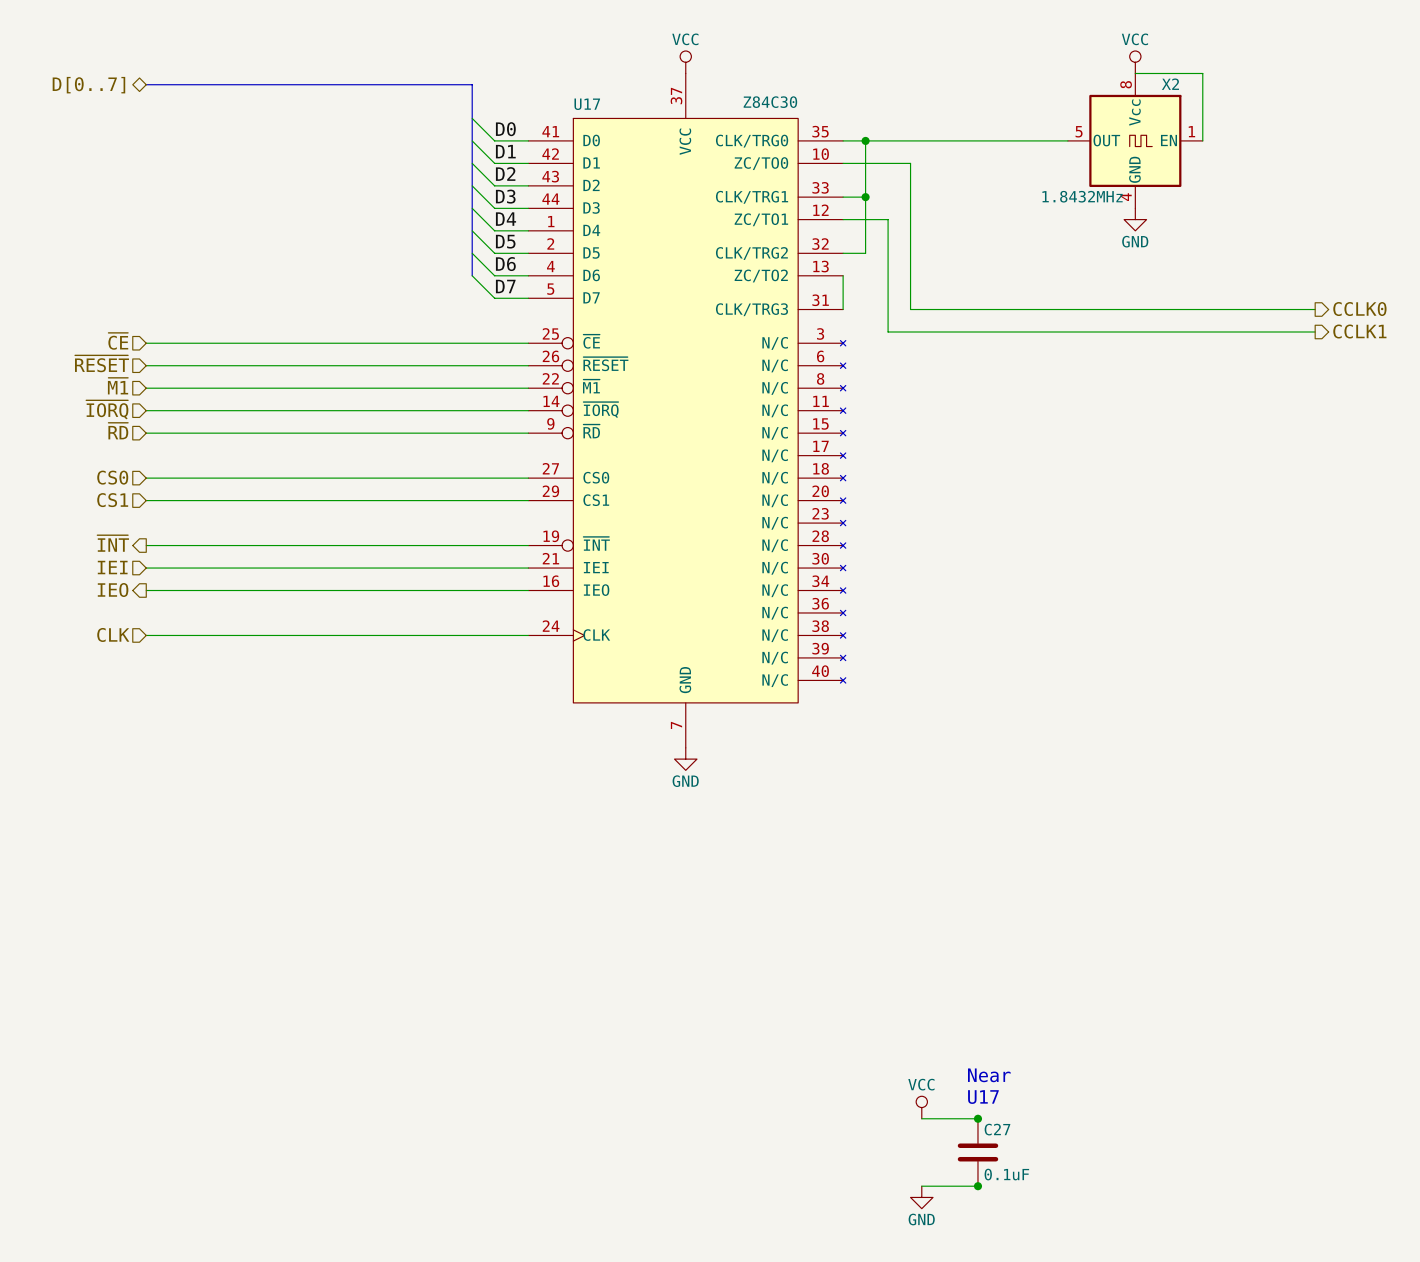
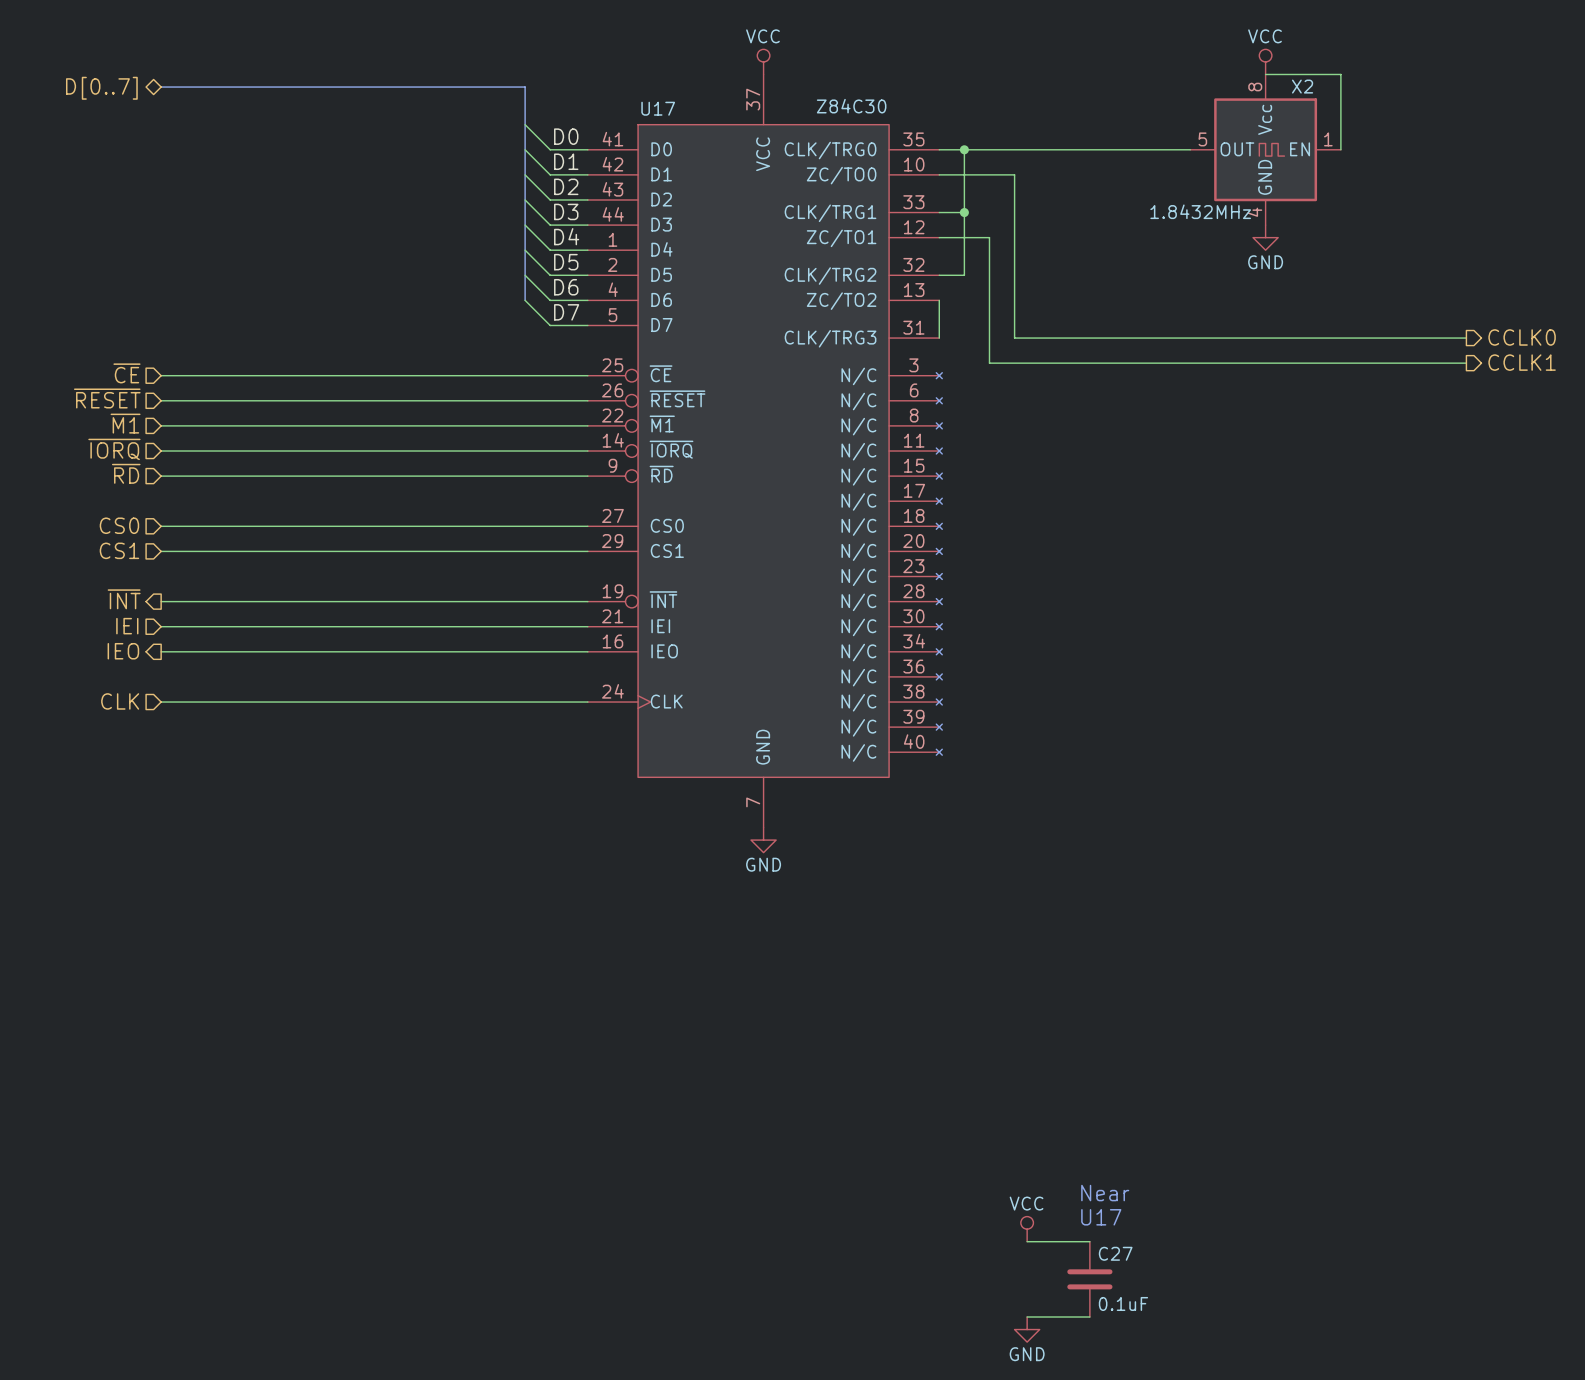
junction: (977, 1118) -> none
junction: (977, 1186) -> none

